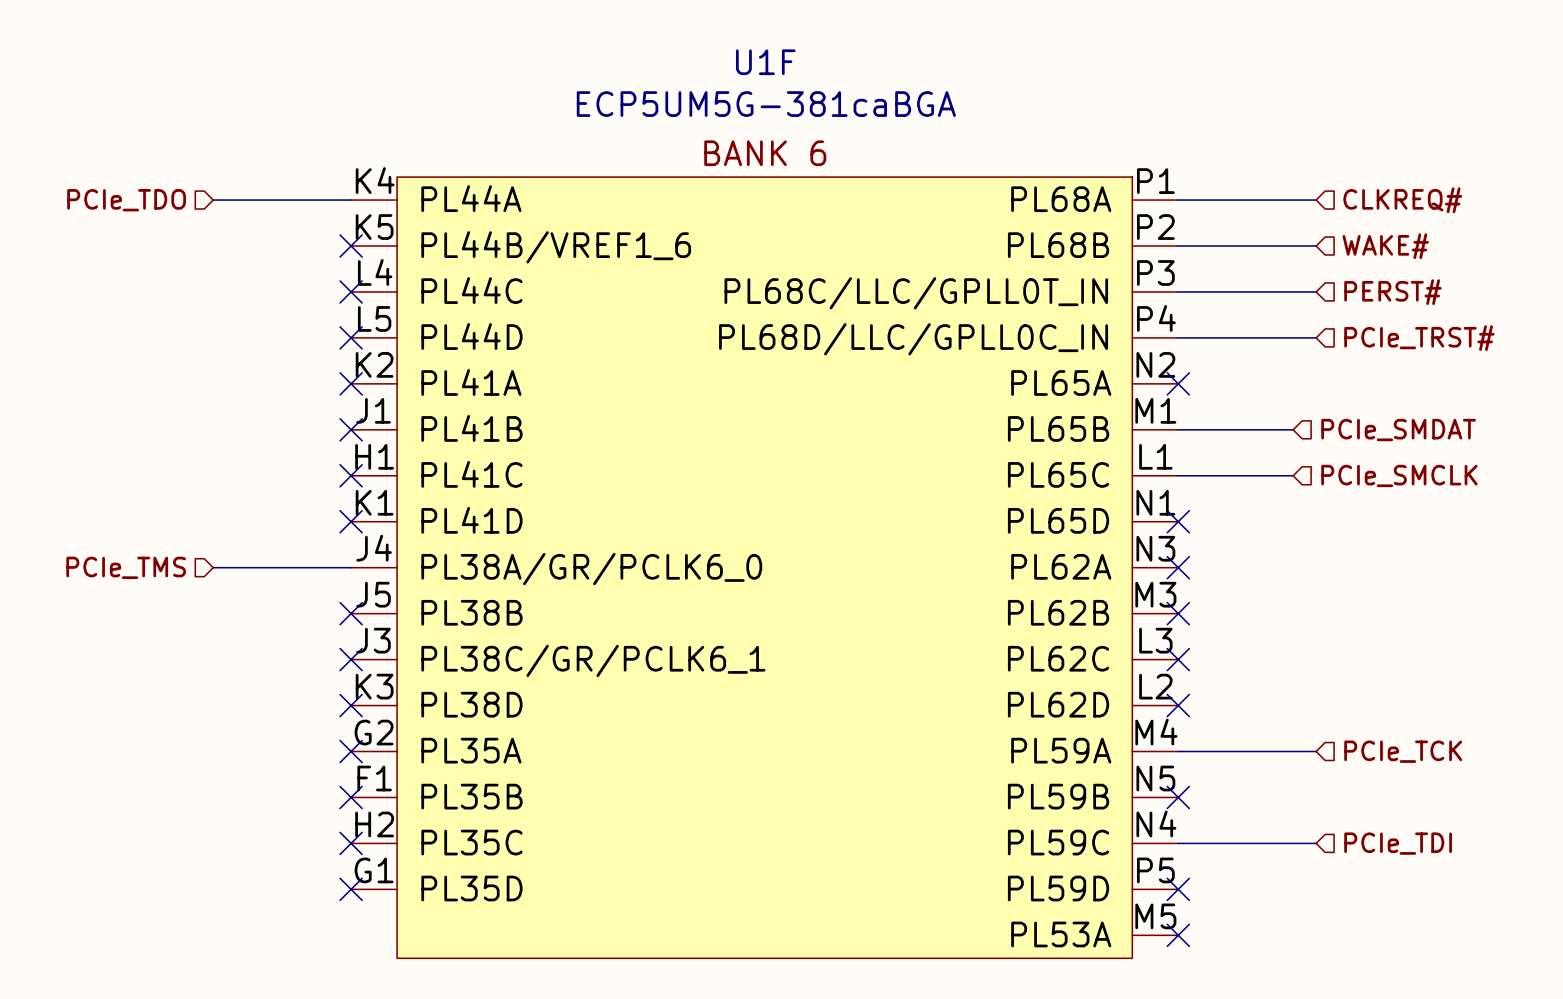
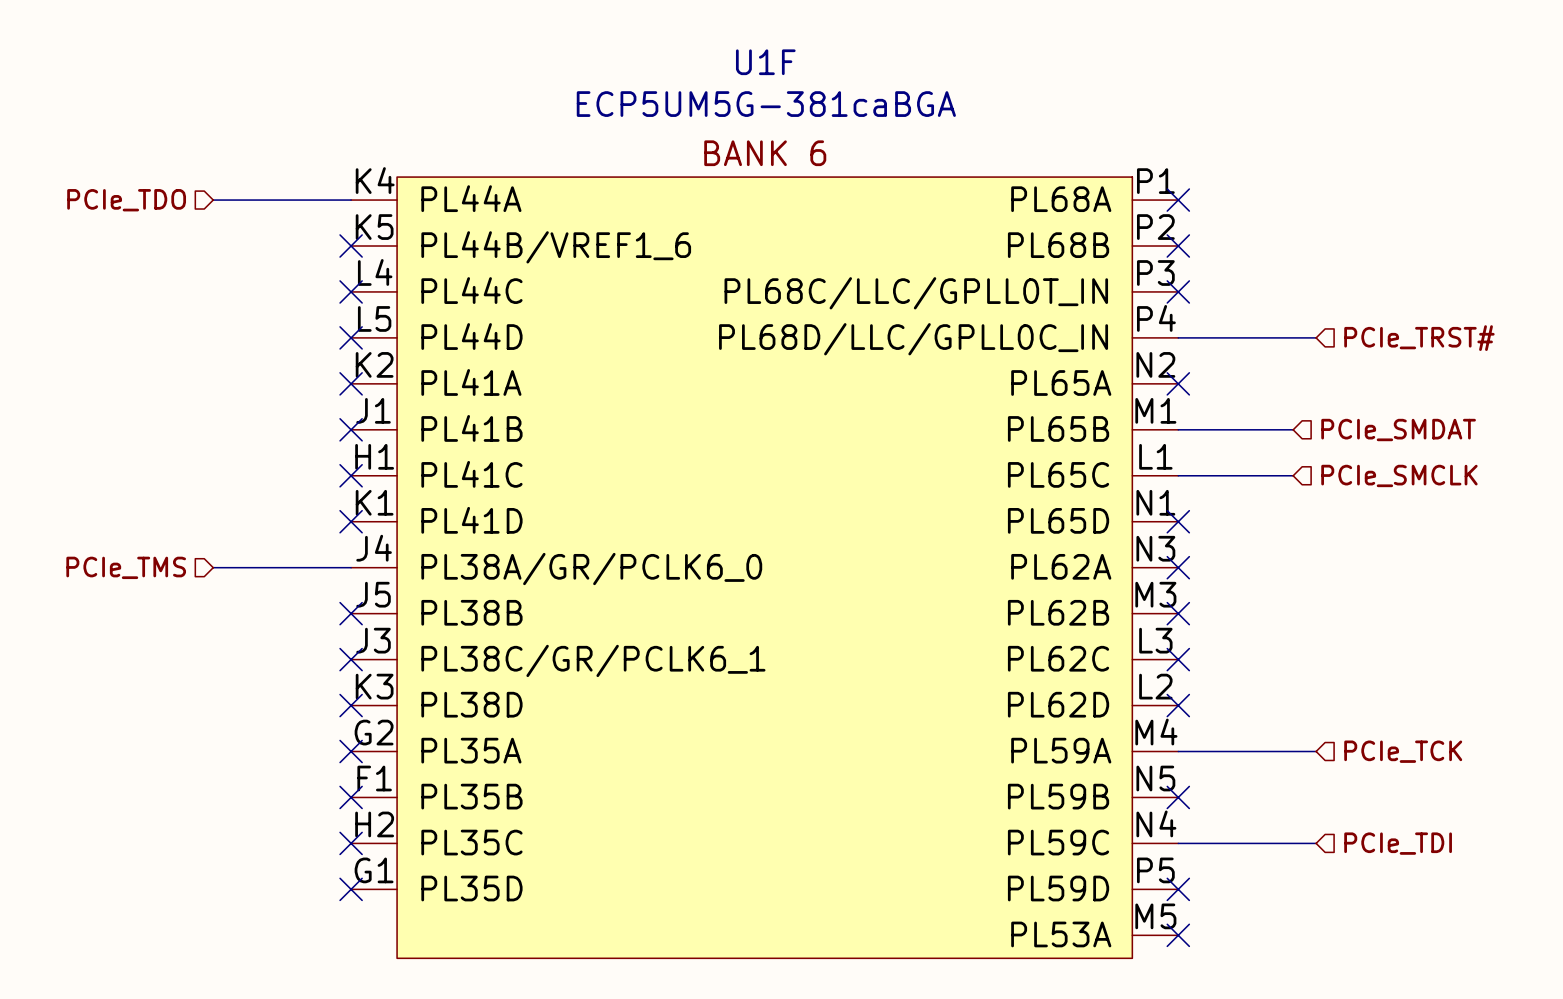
wire: (1178, 200) (1316, 200) -> none
no-connect mark: none -> (1178, 200)
hierarchical label: CLKREQ# (1402, 200) -> none
wire: (1178, 246) (1316, 246) -> none
no-connect mark: none -> (1178, 246)
hierarchical label: WAKE# (1385, 246) -> none
wire: (1178, 291) (1316, 291) -> none
no-connect mark: none -> (1178, 291)
hierarchical label: PERST# (1392, 292) -> none

